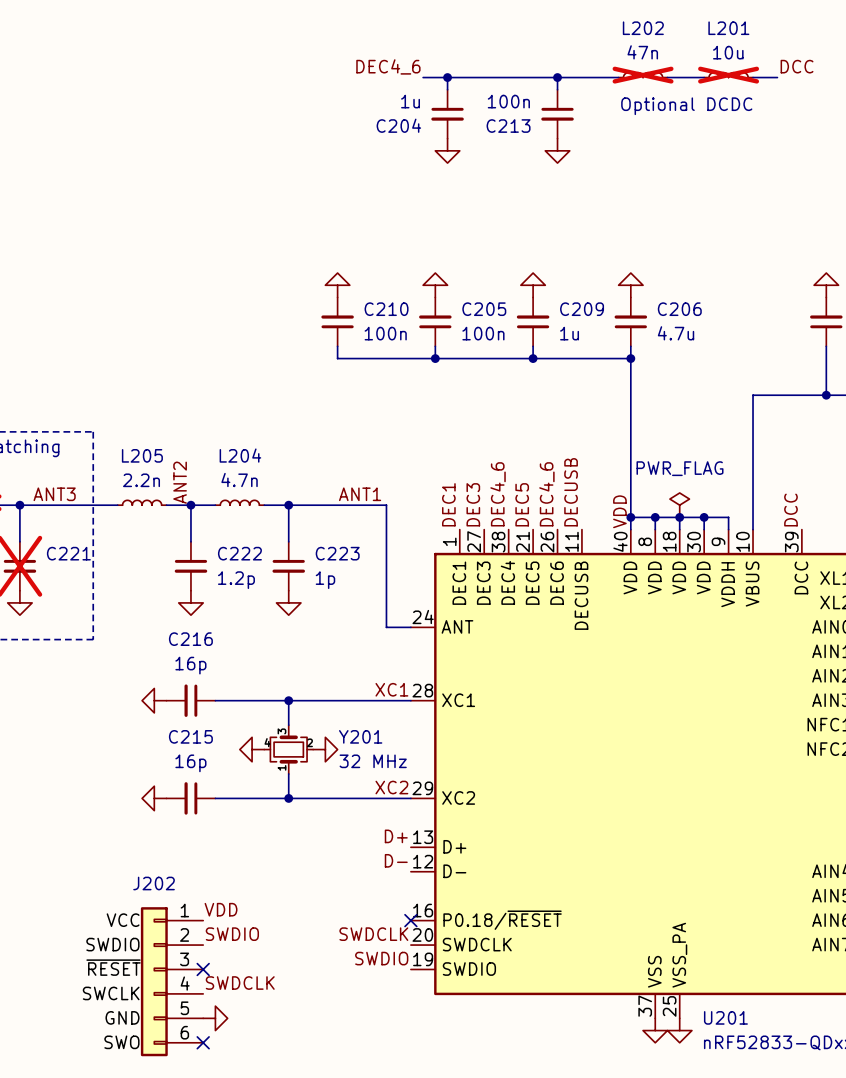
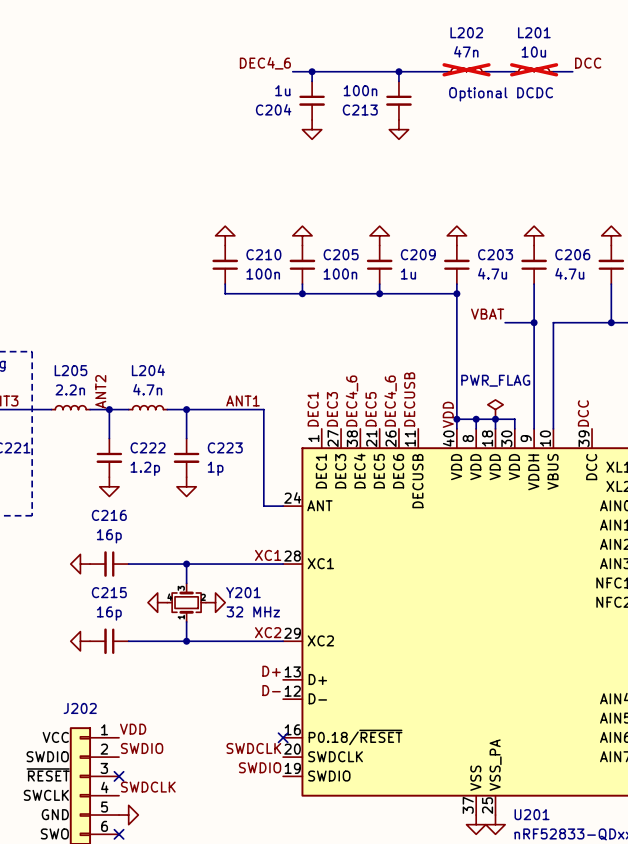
power symbol: none -> (534, 235)
C206 name: C206 (679, 309) -> C203 (495, 254)
C206: none -> 4.7u (534, 264)
label: none -> VBAT (487, 314)
wire: none -> (505, 322) (534, 322)
junction: none -> (534, 322)
wire: (704, 517) (728, 517) -> (534, 284) (534, 419)
junction: (704, 517) -> none

